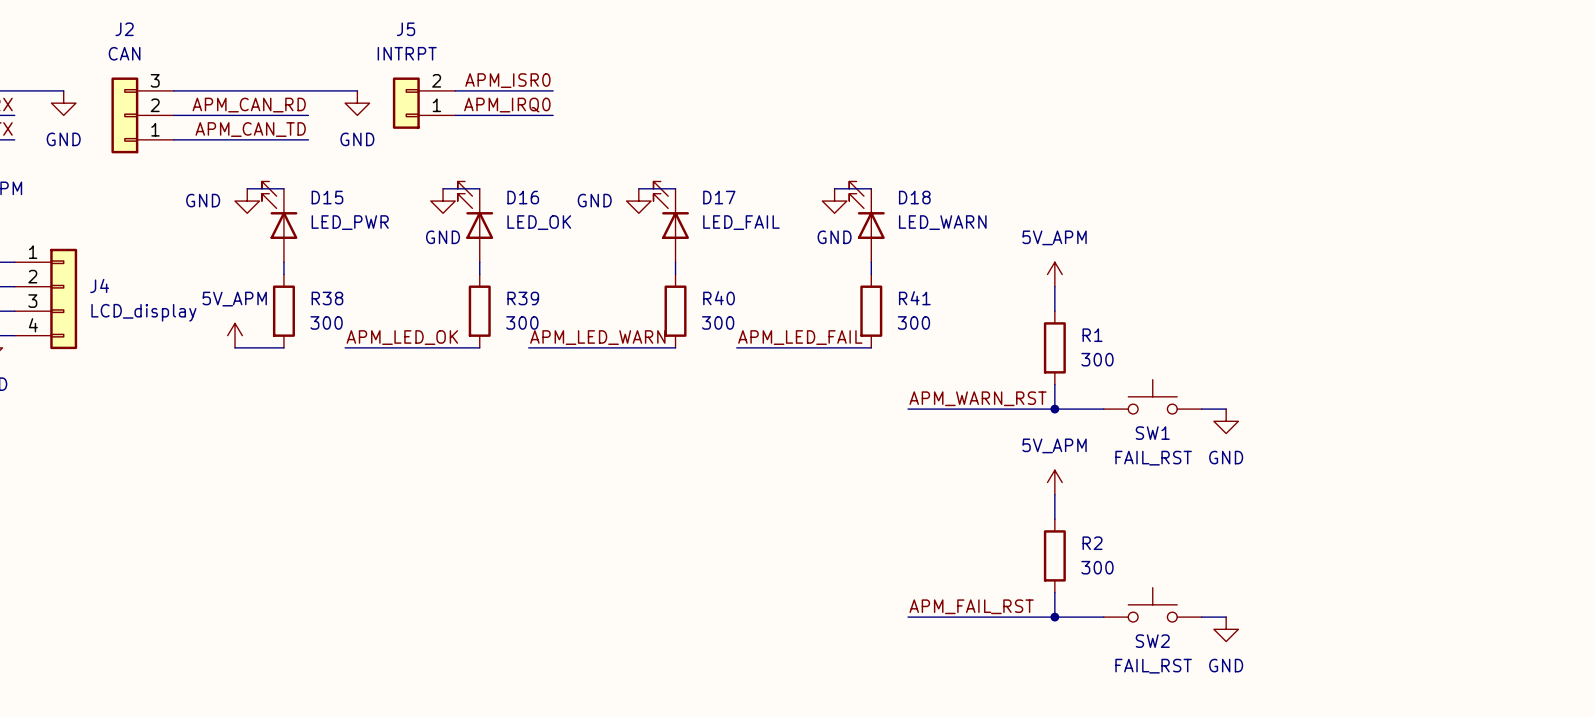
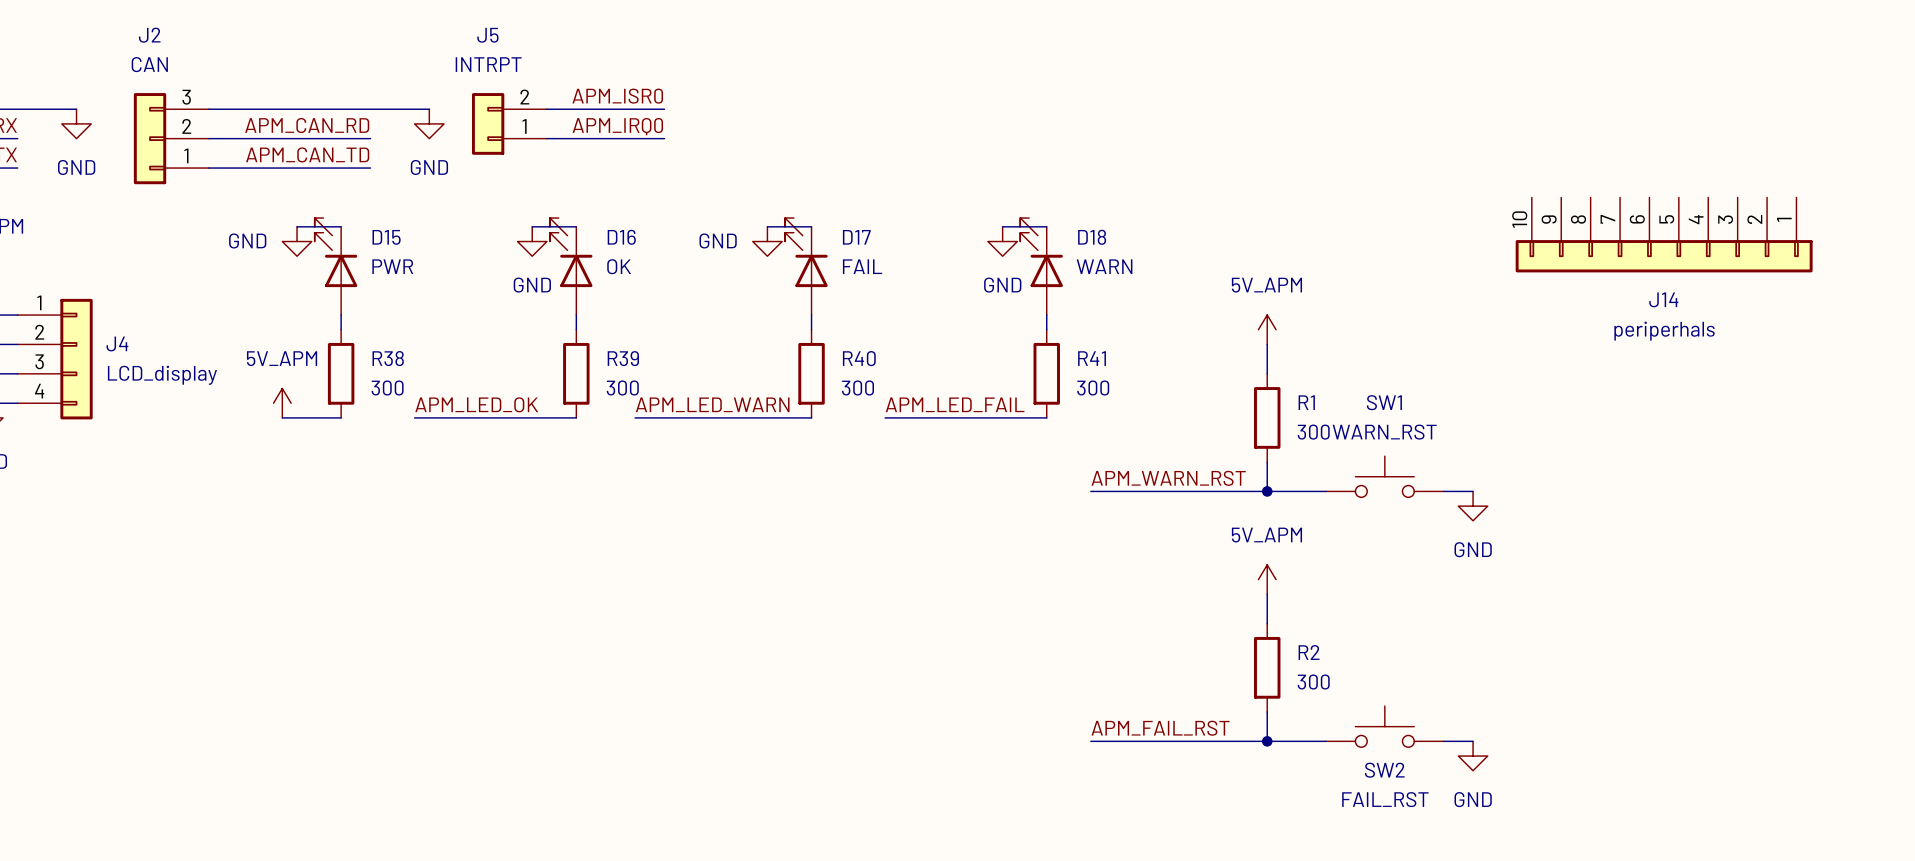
J14: none -> periperhals (1664, 234)
D15 value: LED_PWR (350, 222) -> PWR (392, 266)
D16 value: LED_OK (539, 222) -> OK (619, 266)
D17 value: LED_FAIL (741, 222) -> FAIL (862, 266)
D18 value: LED_WARN (942, 222) -> WARN (1104, 266)
SW1 name position: SW1 (1152, 433) -> SW1 (1384, 402)
SW1 value: FAIL_RST (1153, 458) -> WARN_RST (1384, 432)

